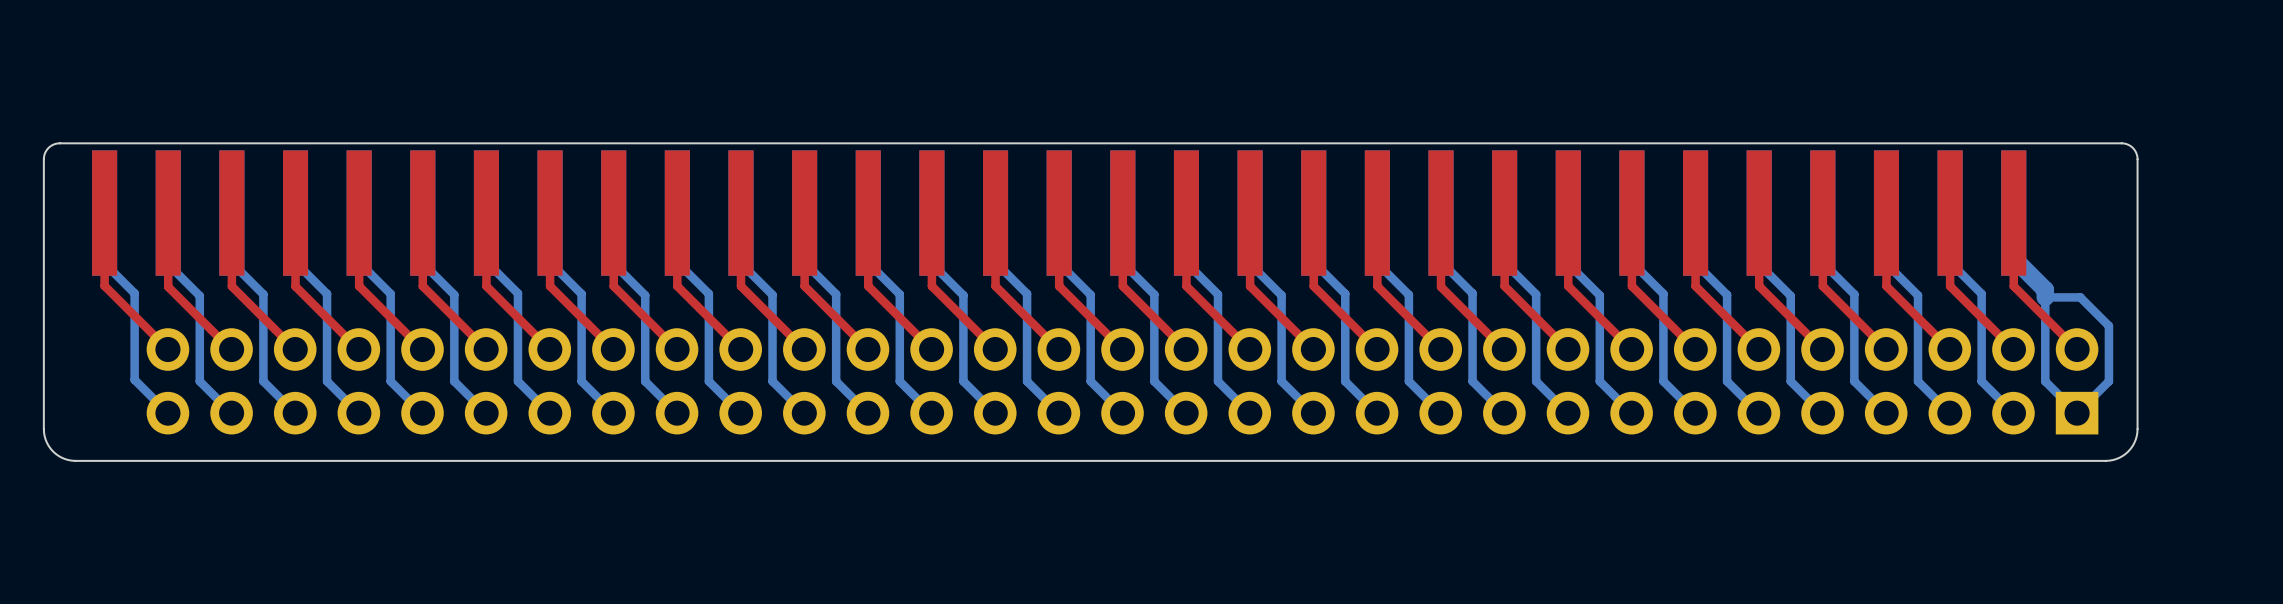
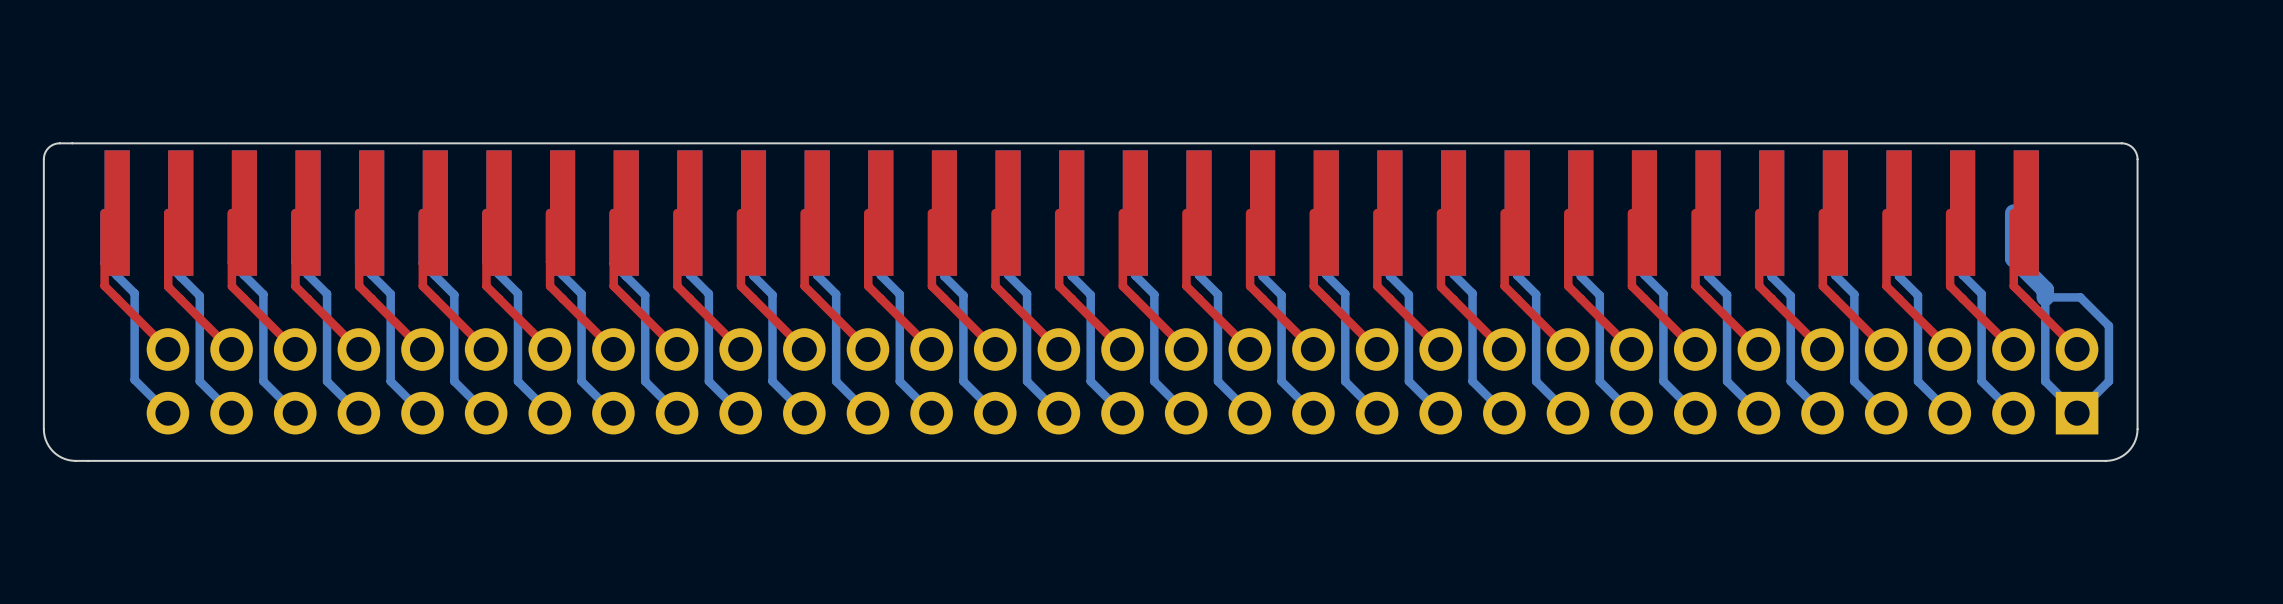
part position: (1059, 213) -> (1071, 213)

